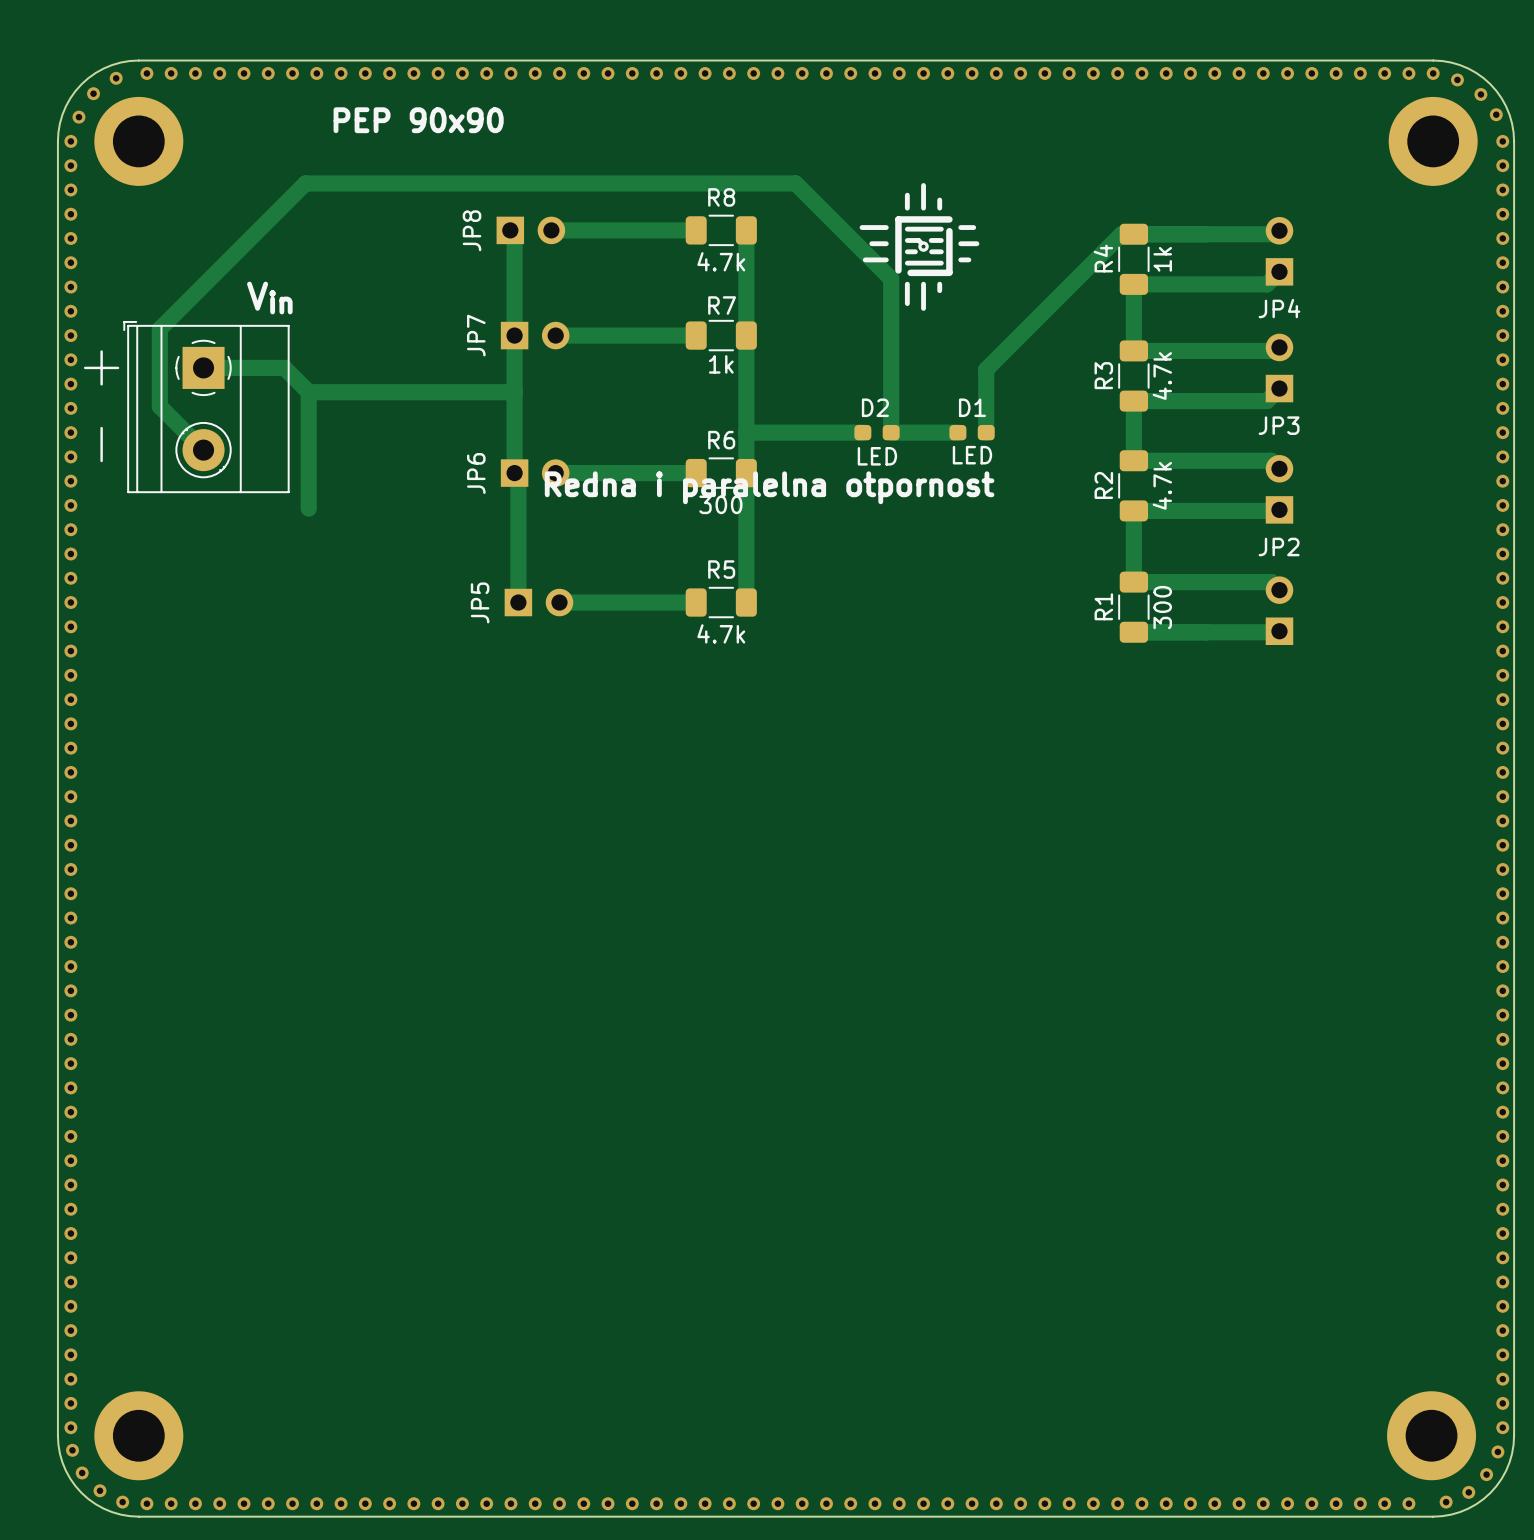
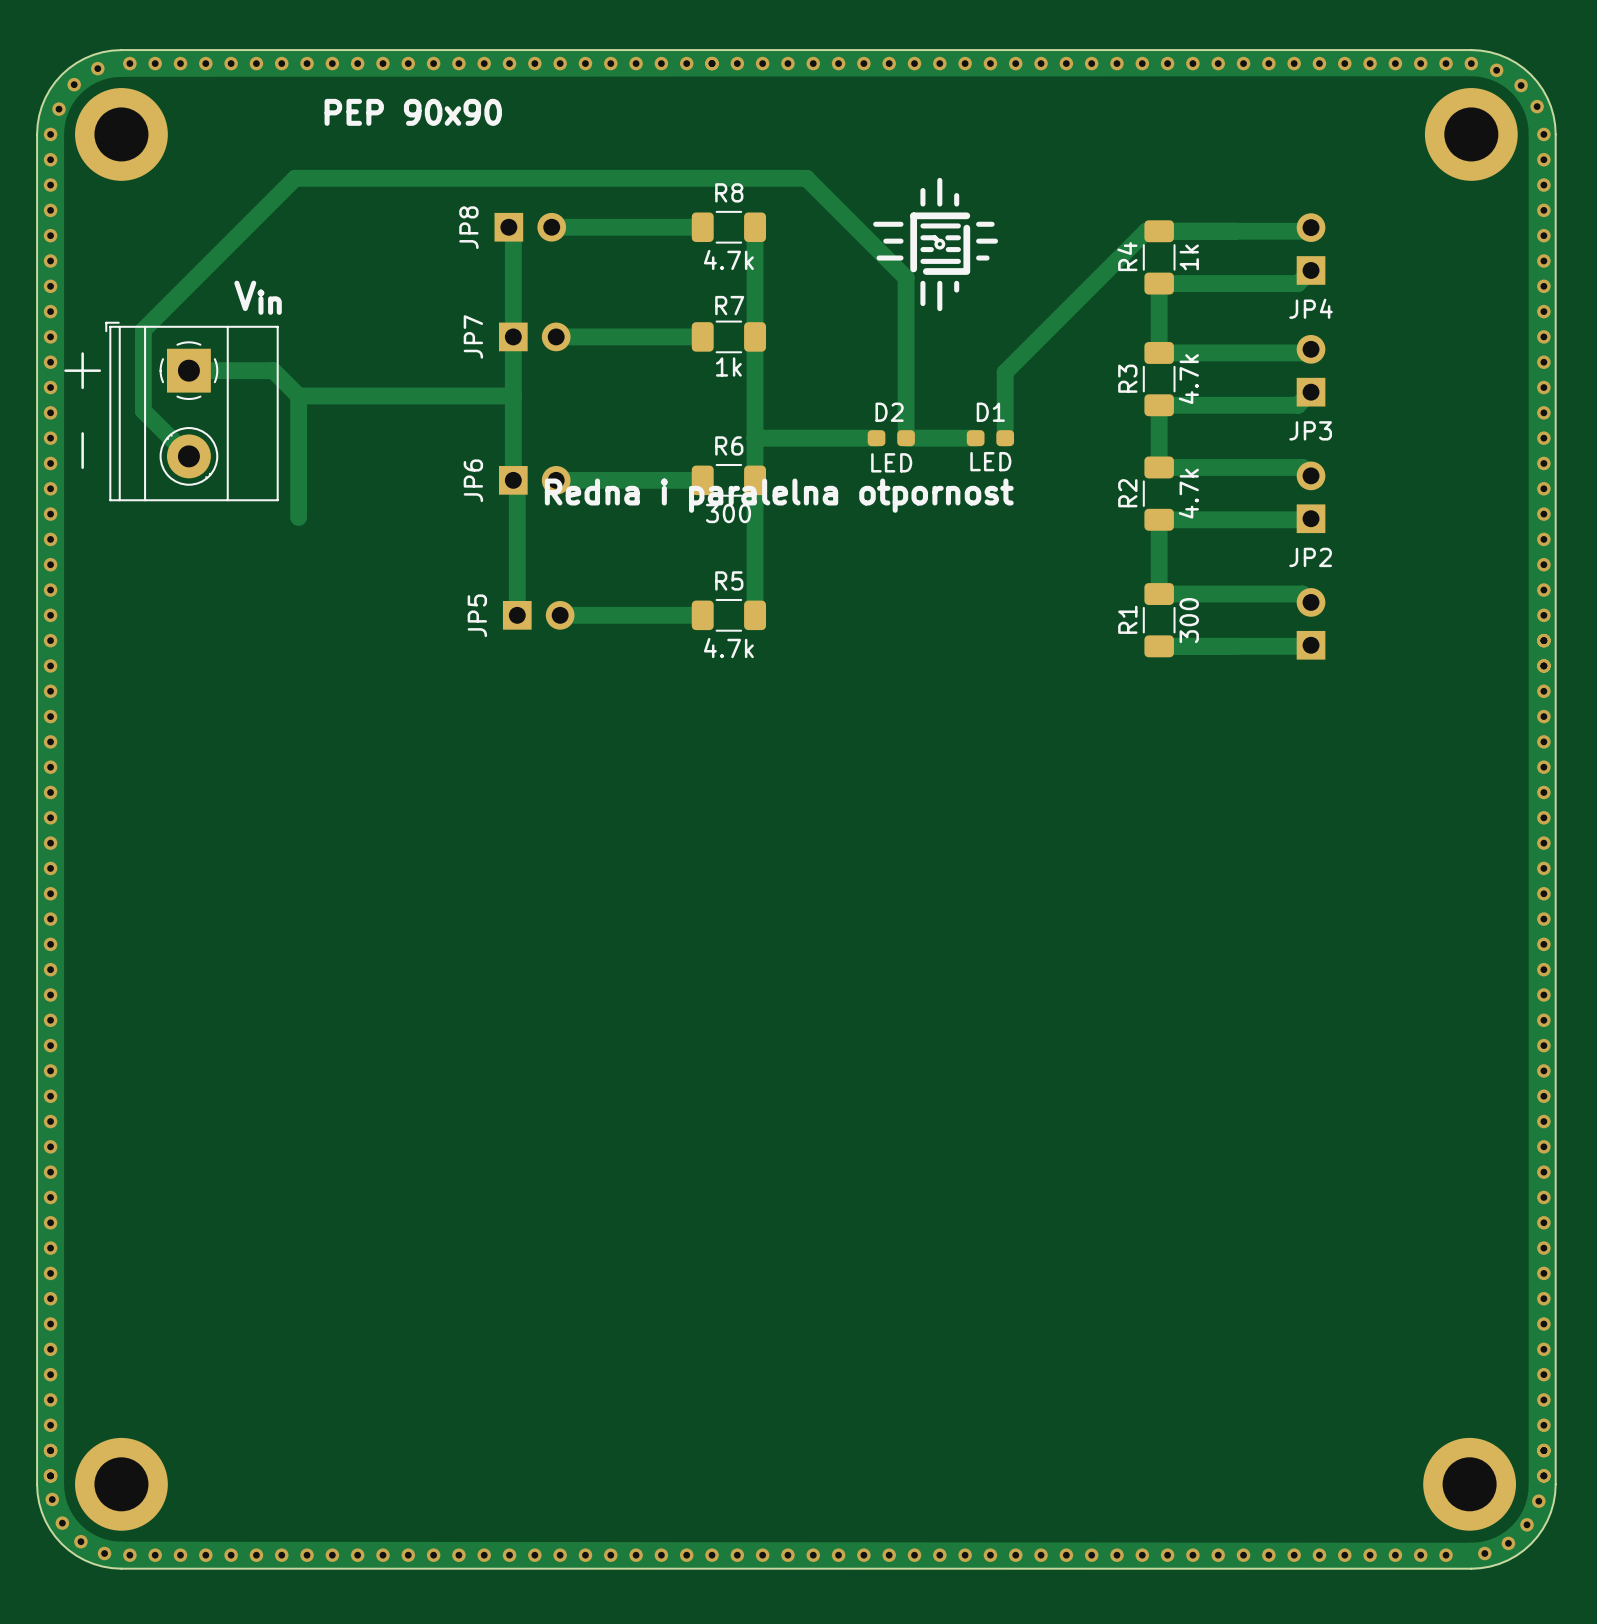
track: none -> (1542, 133) (1540, 117) (1535, 102) (1521, 83) (1508, 73) (1494, 66) (1471, 62) (121, 63) (97, 67) (83, 74) (71, 84) (57, 103) (52, 118) (50, 134) (50, 1484) (54, 1507) (61, 1522) (71, 1534) (83, 1544) (98, 1551) (121, 1555) (1471, 1556) (1494, 1552) (1509, 1545) (1521, 1535) (1535, 1515) (1540, 1500) (1542, 1485)
track: none -> (1542, 134) (1542, 1484)

